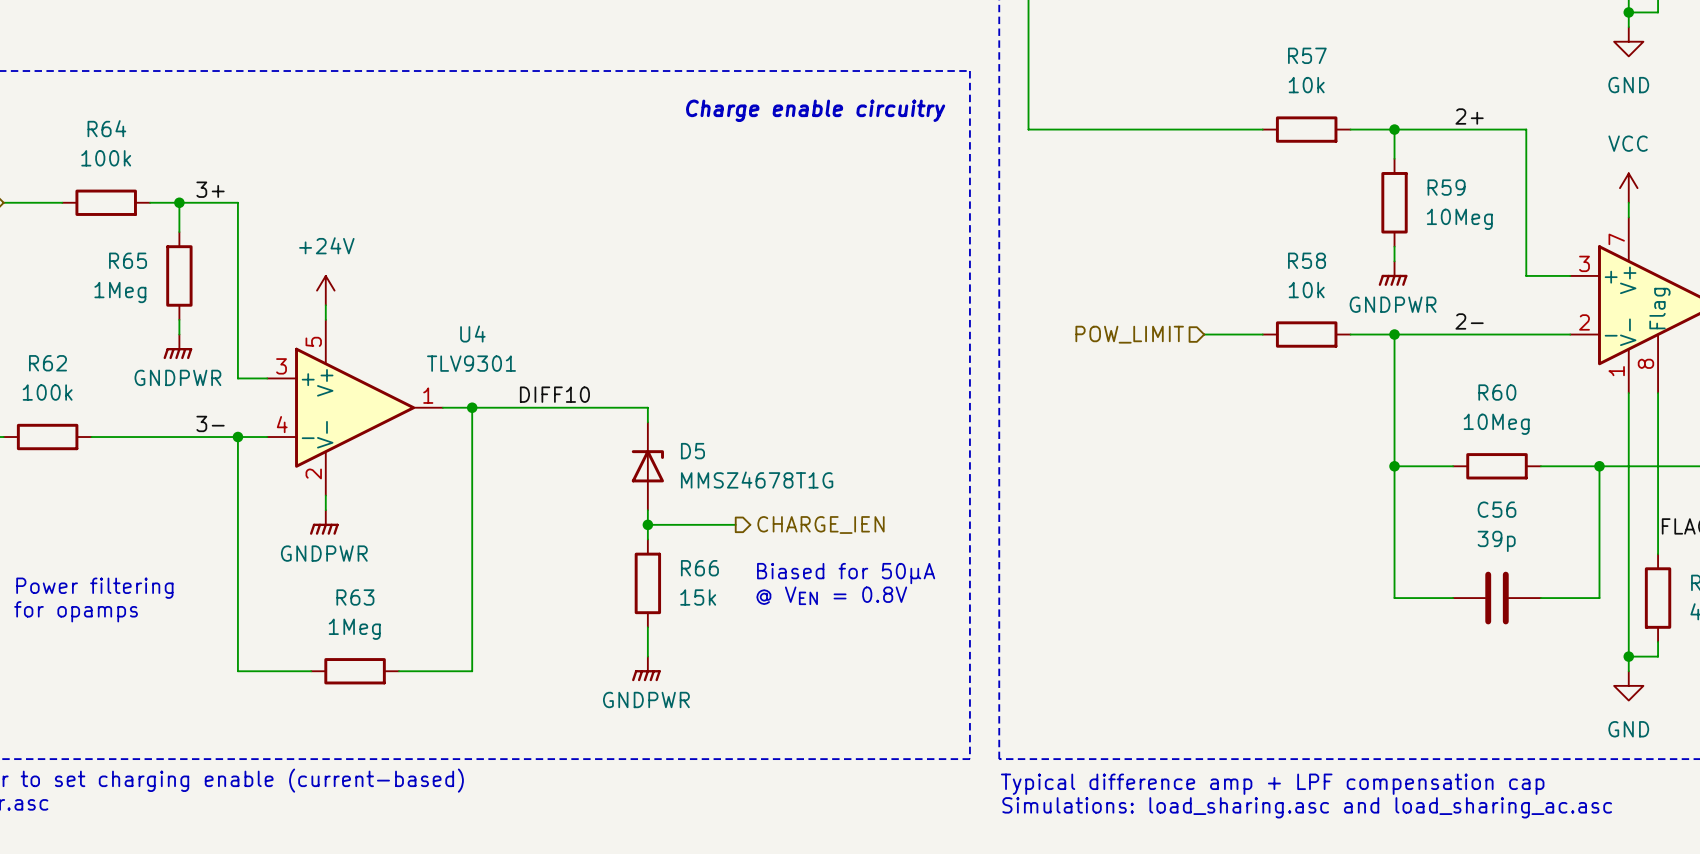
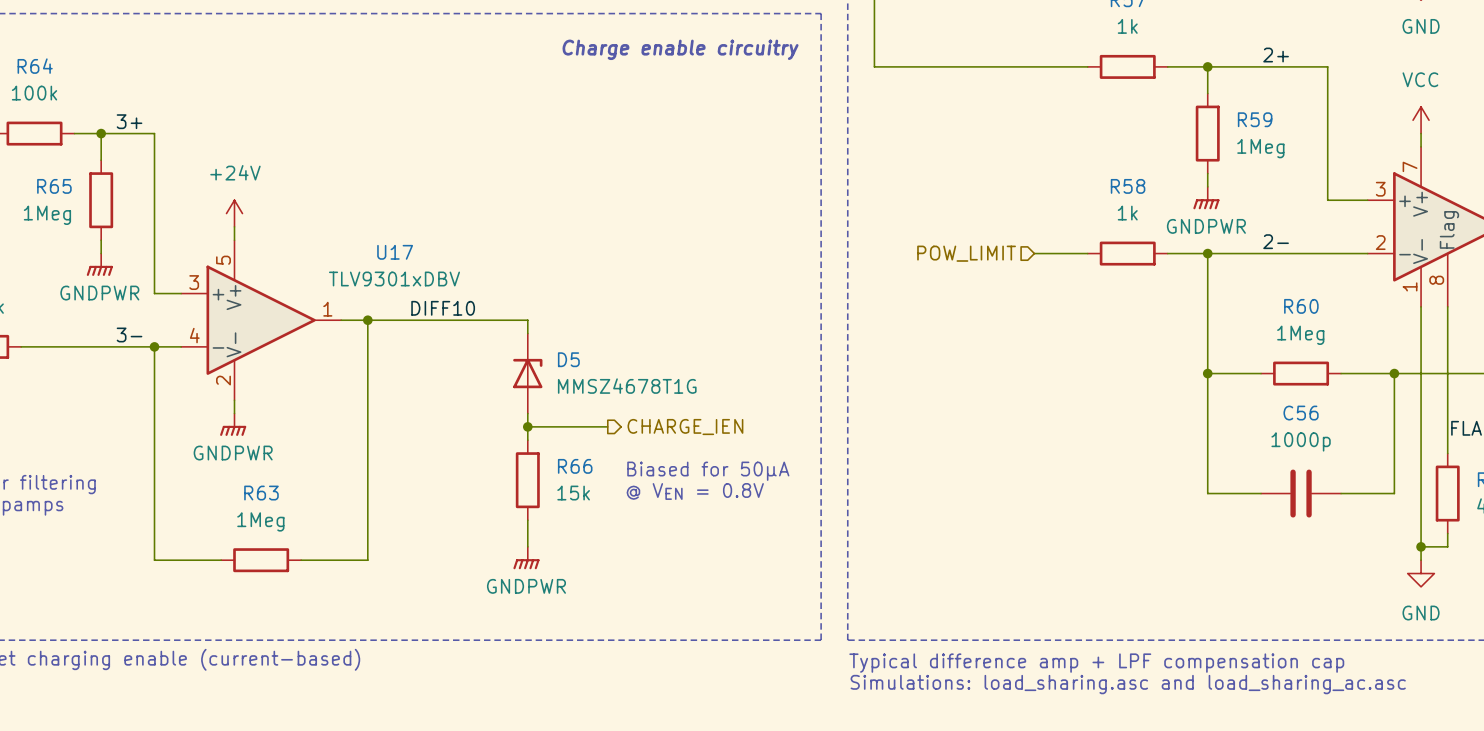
R57 value: 10k (1306, 85) -> 1k (1127, 26)
R59 value: 10Meg (1459, 219) -> 1Meg (1260, 148)
R58 value: 10k (1306, 290) -> 1k (1127, 213)
U4 name: U4 (472, 333) -> U17 (395, 252)
U4 value: TLV9301 (471, 363) -> TLV9301xDBV (394, 278)
R60 value: 10Meg (1496, 424) -> 1Meg (1300, 335)
C56 value: 39p (1496, 541) -> 1000p (1301, 441)

